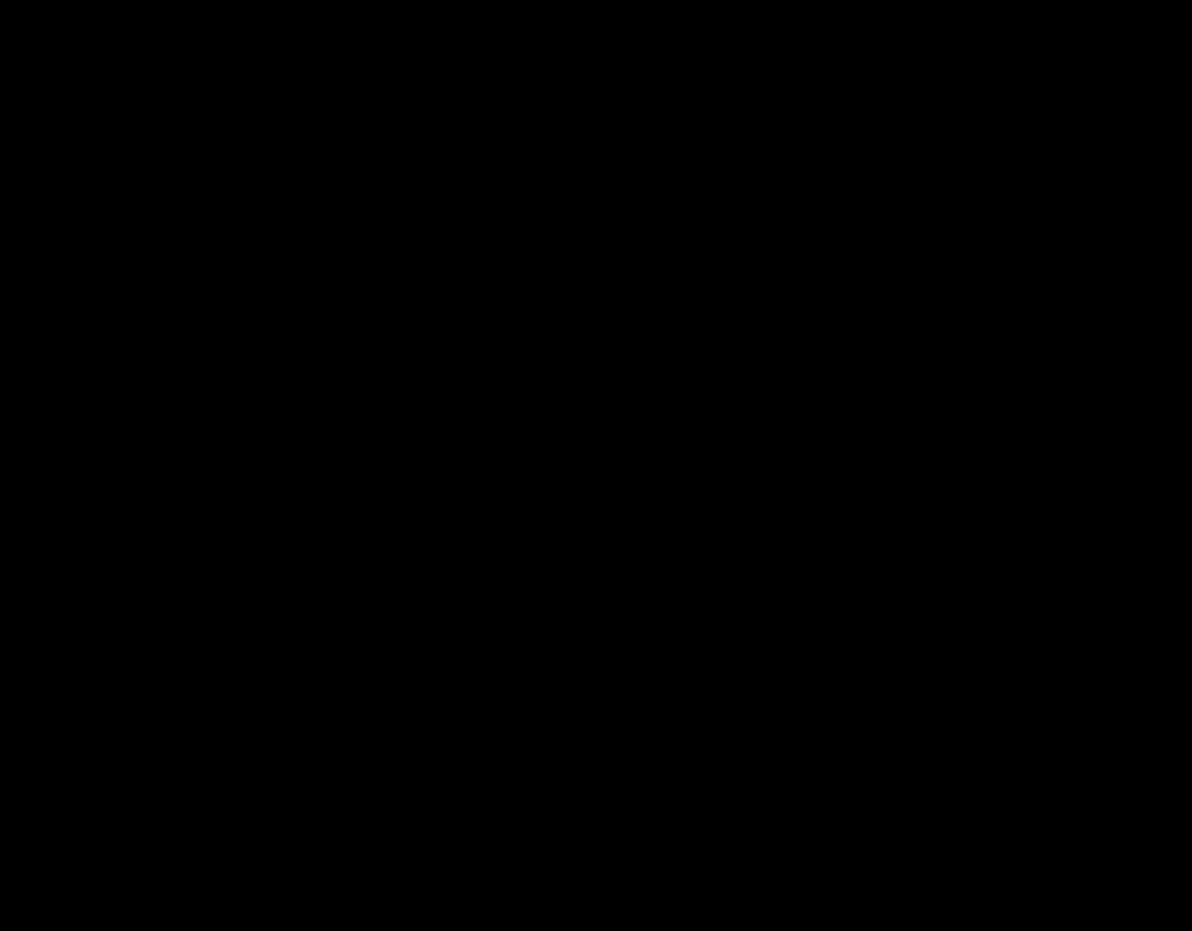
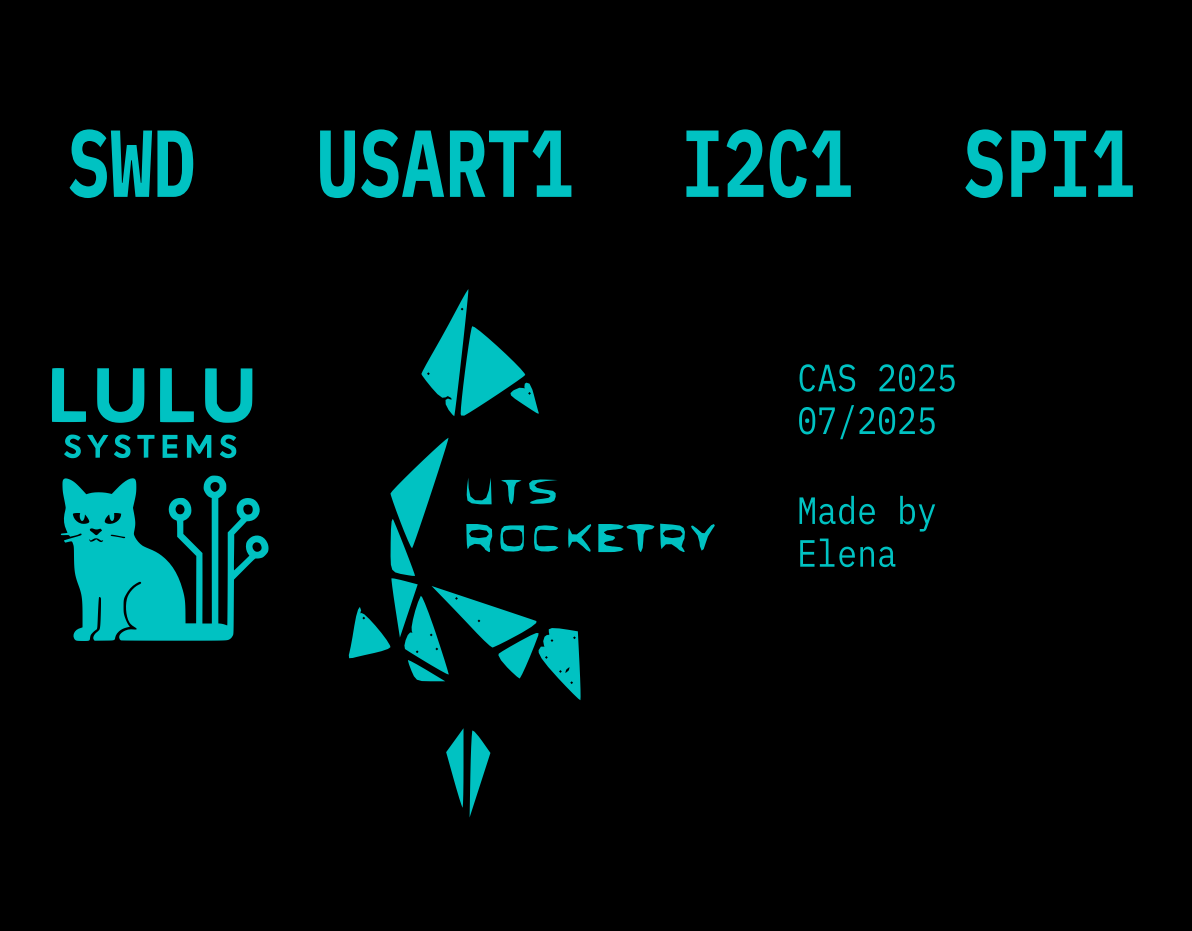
text: none -> SWD (131, 163)
text: none -> USART1 (445, 163)
text: none -> I2C1 (768, 163)
text: none -> SPI1 (1049, 163)
drawing: none -> [348, 289, 715, 818]
drawing: none -> [51, 368, 269, 641]
text: none -> CAS 2025 (877, 377)
text: none -> 07/2025 (866, 422)
text: none -> Made by (867, 513)
text: none -> Elena (847, 552)

